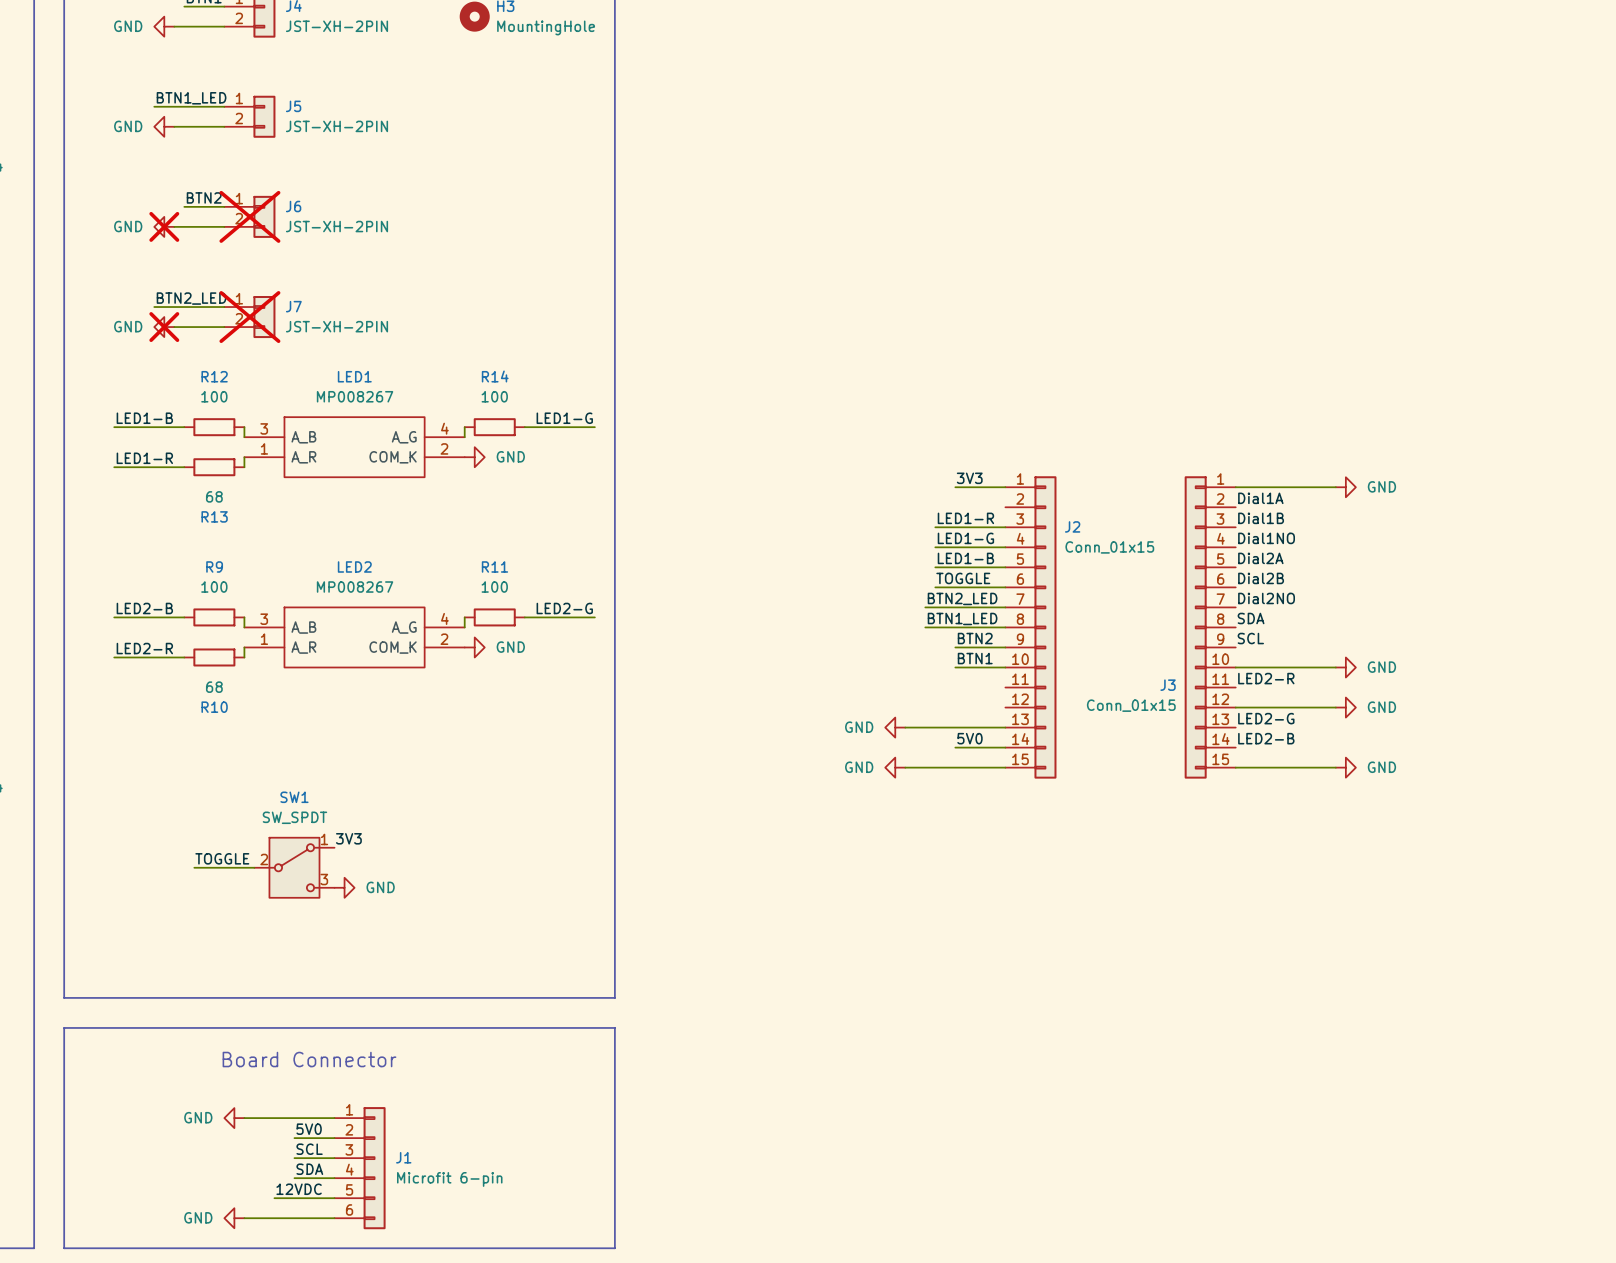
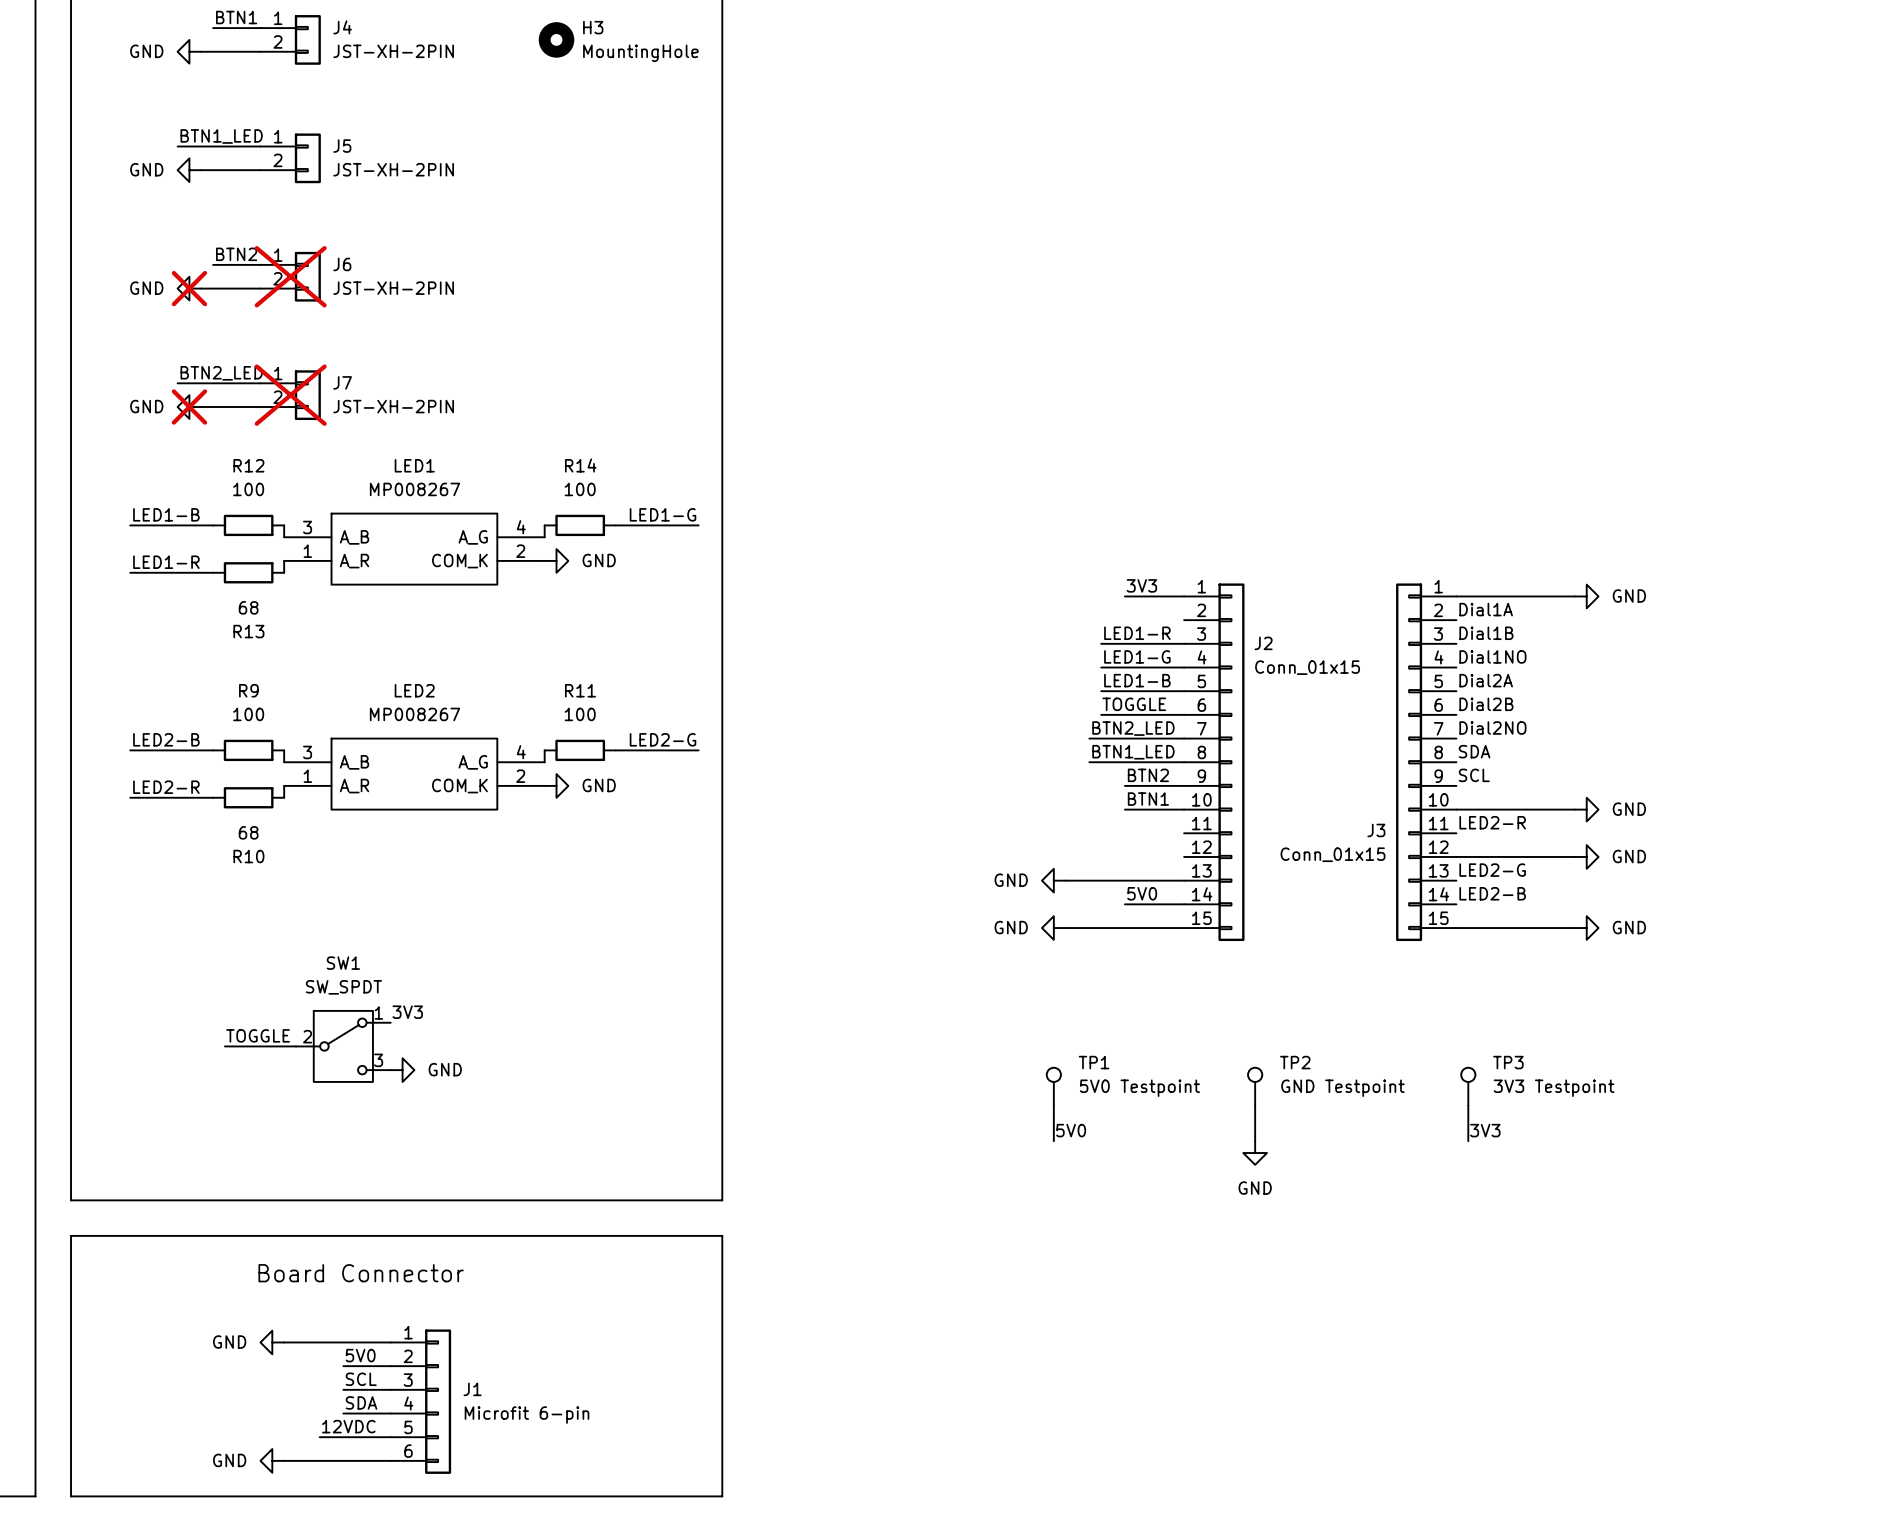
TP1: none -> 5V0 Testpoint (1053, 1086)
TP2: none -> GND Testpoint (1255, 1086)
TP3: none -> 3V3 Testpoint (1468, 1086)
wire: none -> (1053, 1105) (1053, 1141)
wire: none -> (1255, 1105) (1255, 1141)
wire: none -> (1468, 1105) (1468, 1141)
label: none -> 5V0 (1071, 1130)
label: none -> 3V3 (1485, 1130)
power symbol: none -> GND (1255, 1153)

